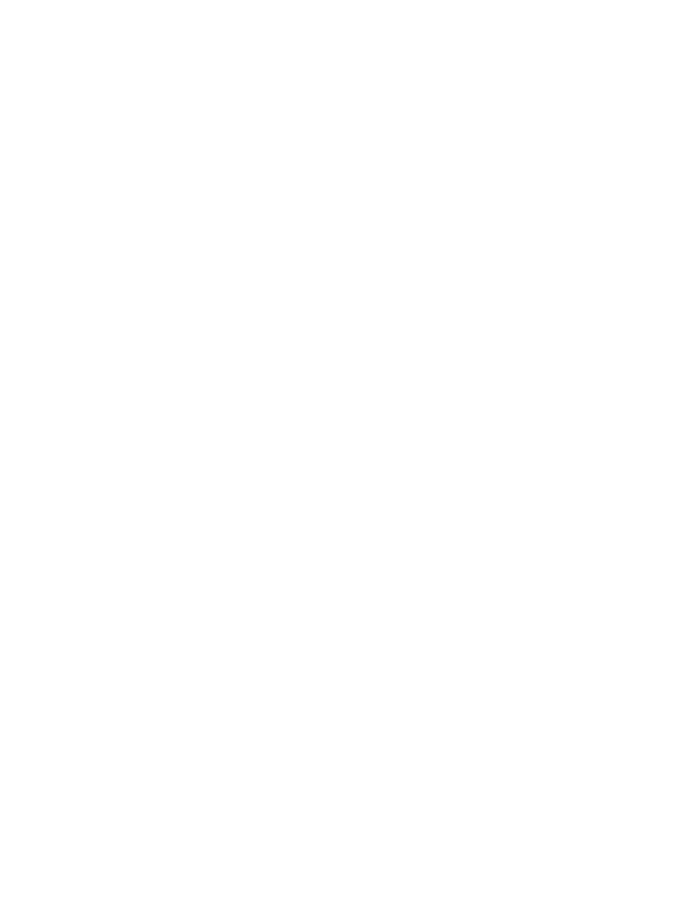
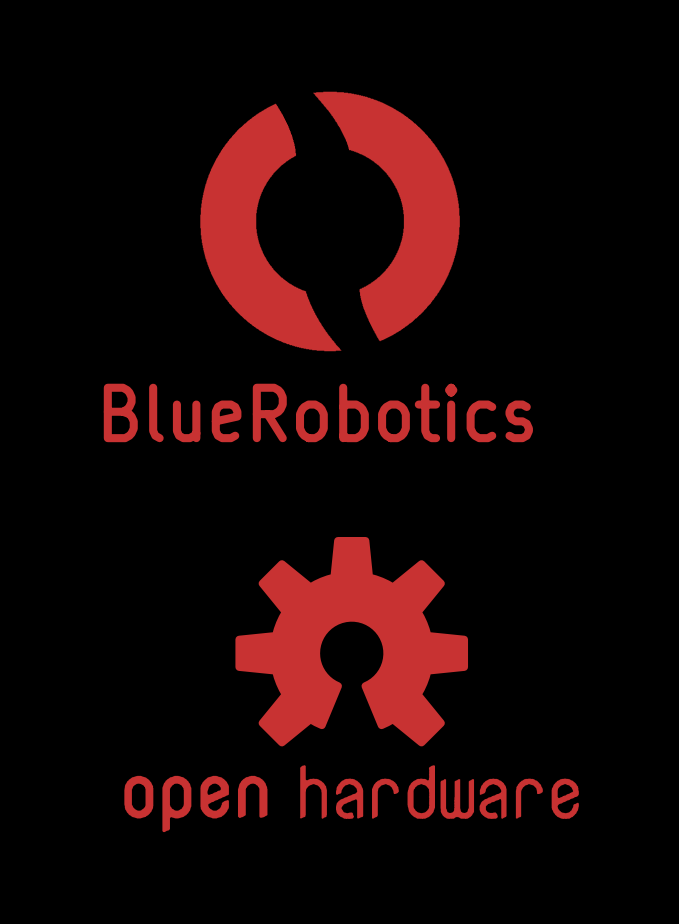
part: none -> (330, 221)
part: none -> (351, 684)

